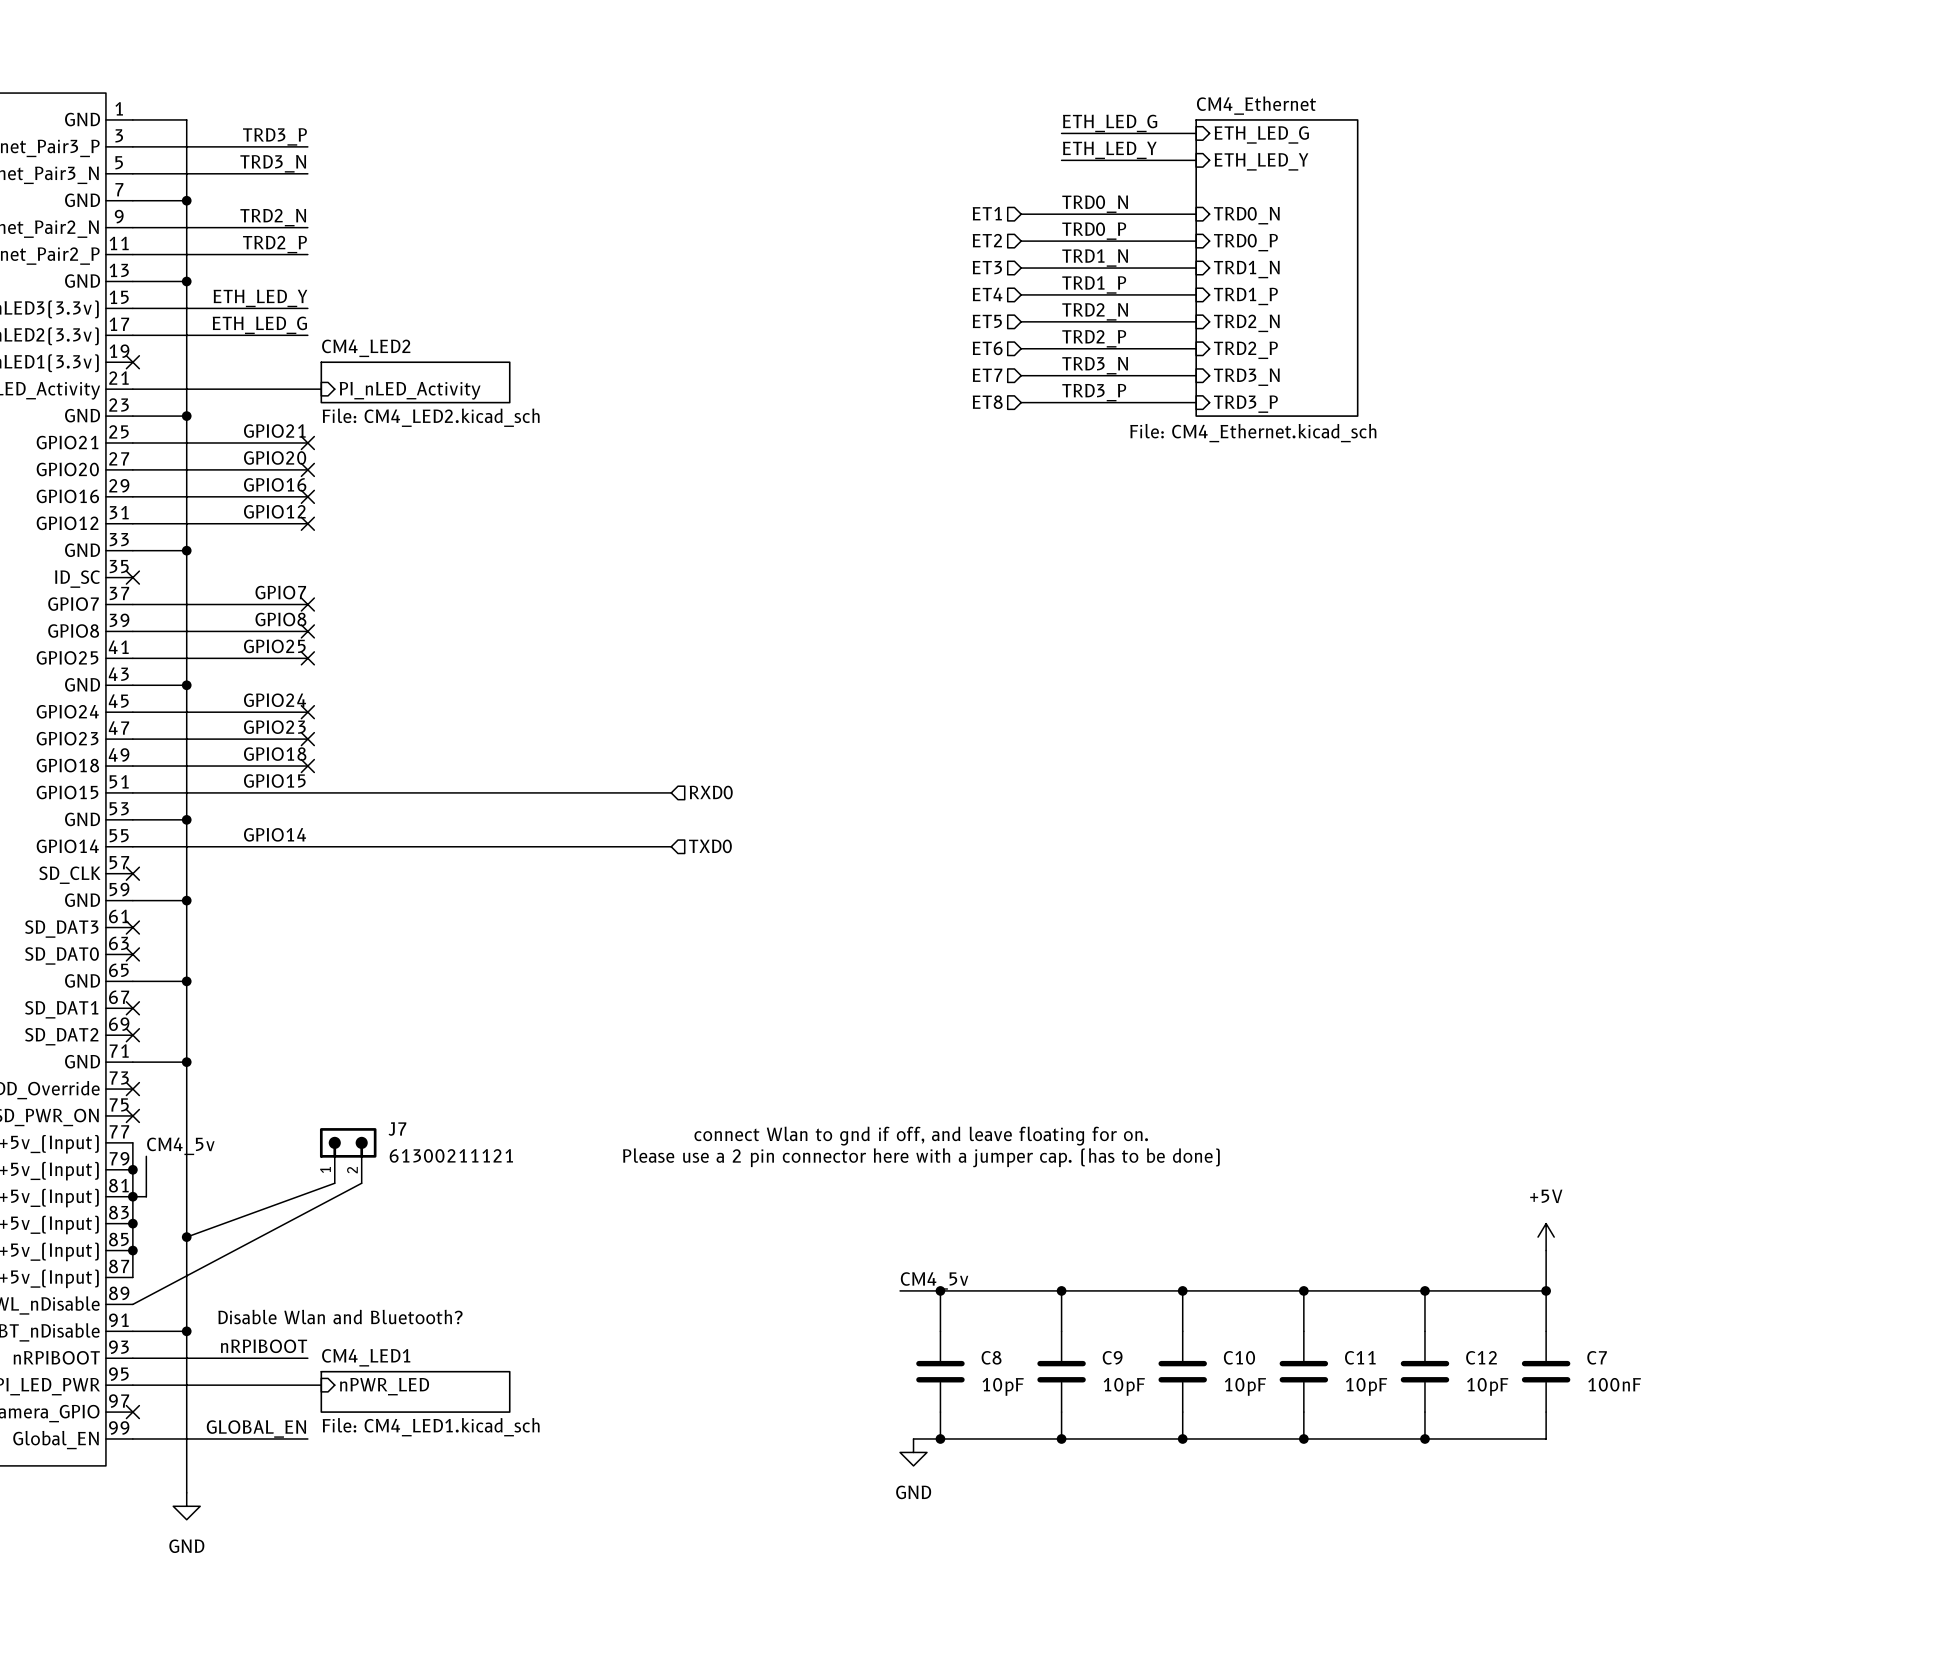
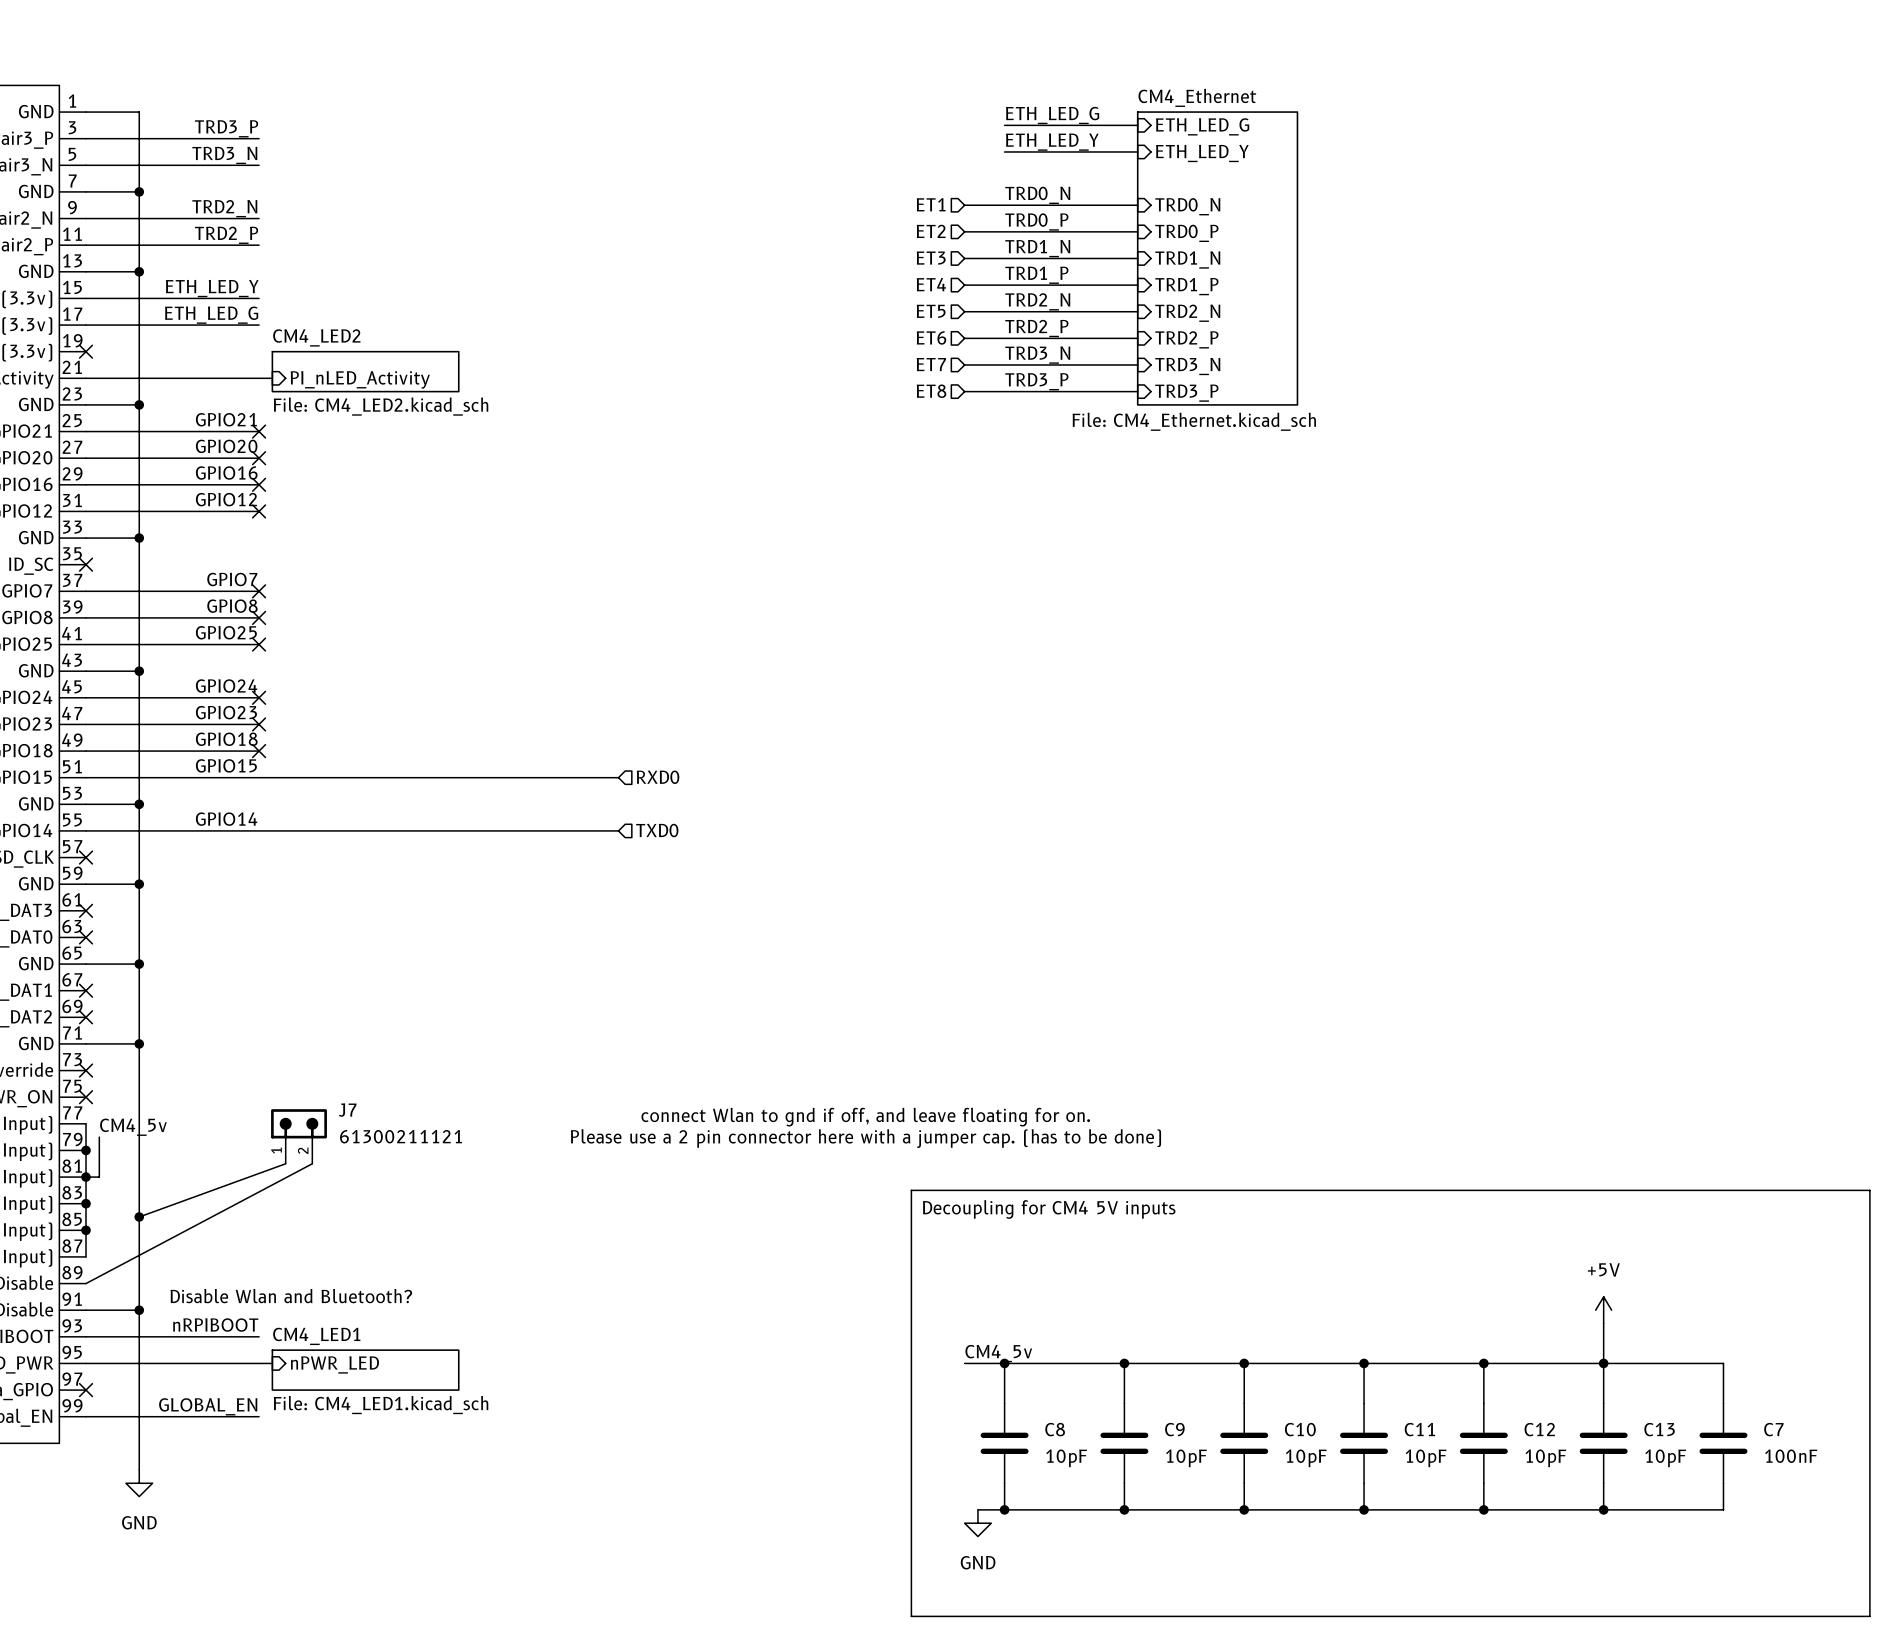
line: none -> (911, 1190) (1869, 1190) (1869, 1616) (911, 1616) (911, 1190)
text: none -> Decoupling for CM4 5V inputs (1049, 1209)
power symbol position: +5V (1546, 1237) -> +5V (1603, 1310)
wire: (1546, 1250) (1546, 1331) -> (1603, 1323) (1603, 1403)
label position: CM4_5v (934, 1280) -> CM4_5v (998, 1353)
wire: (900, 1290) (1546, 1290) -> none
wire: (940, 1290) (940, 1331) -> none
junction: (940, 1290) -> none
wire: (1061, 1290) (1061, 1331) -> none
junction: (1061, 1290) -> none
wire: (1182, 1290) (1182, 1331) -> none
junction: (1182, 1290) -> none
wire: (1303, 1290) (1303, 1331) -> none
junction: (1303, 1290) -> none
wire: (1424, 1290) (1424, 1331) -> none
junction: (1424, 1290) -> none
junction: (1546, 1290) -> none
C8 position: (940, 1371) -> (1004, 1443)
C9 position: (1061, 1371) -> (1124, 1443)
C10 position: (1182, 1371) -> (1244, 1443)
C11 position: (1303, 1371) -> (1364, 1443)
C12 position: (1424, 1371) -> (1483, 1443)
C7 position: (1546, 1371) -> (1723, 1443)
wire: none -> (964, 1363) (1723, 1363) (1723, 1403)
junction: none -> (1004, 1363)
junction: none -> (1124, 1363)
junction: none -> (1244, 1363)
junction: none -> (1364, 1363)
junction: none -> (1483, 1363)
junction: none -> (1603, 1363)
wire: (940, 1412) (940, 1438) -> (1004, 1483) (1004, 1509)
wire: (1546, 1425) (1546, 1438) (913, 1438) -> none
junction: (940, 1438) -> none
junction: (1061, 1438) -> none
junction: (1182, 1438) -> none
junction: (1303, 1438) -> none
junction: (1424, 1438) -> none
power symbol position: GND (913, 1452) -> GND (977, 1523)
C13: none -> 10pF (1603, 1443)
wire: none -> (1124, 1483) (1124, 1509)
wire: none -> (1244, 1483) (1244, 1509)
wire: none -> (1364, 1483) (1364, 1509)
wire: none -> (1483, 1483) (1483, 1509)
wire: none -> (1603, 1483) (1603, 1509)
wire: none -> (1723, 1483) (1723, 1509) (977, 1509)
junction: none -> (1004, 1509)
junction: none -> (1124, 1509)
junction: none -> (1244, 1509)
junction: none -> (1364, 1509)
junction: none -> (1483, 1509)
junction: none -> (1603, 1509)

